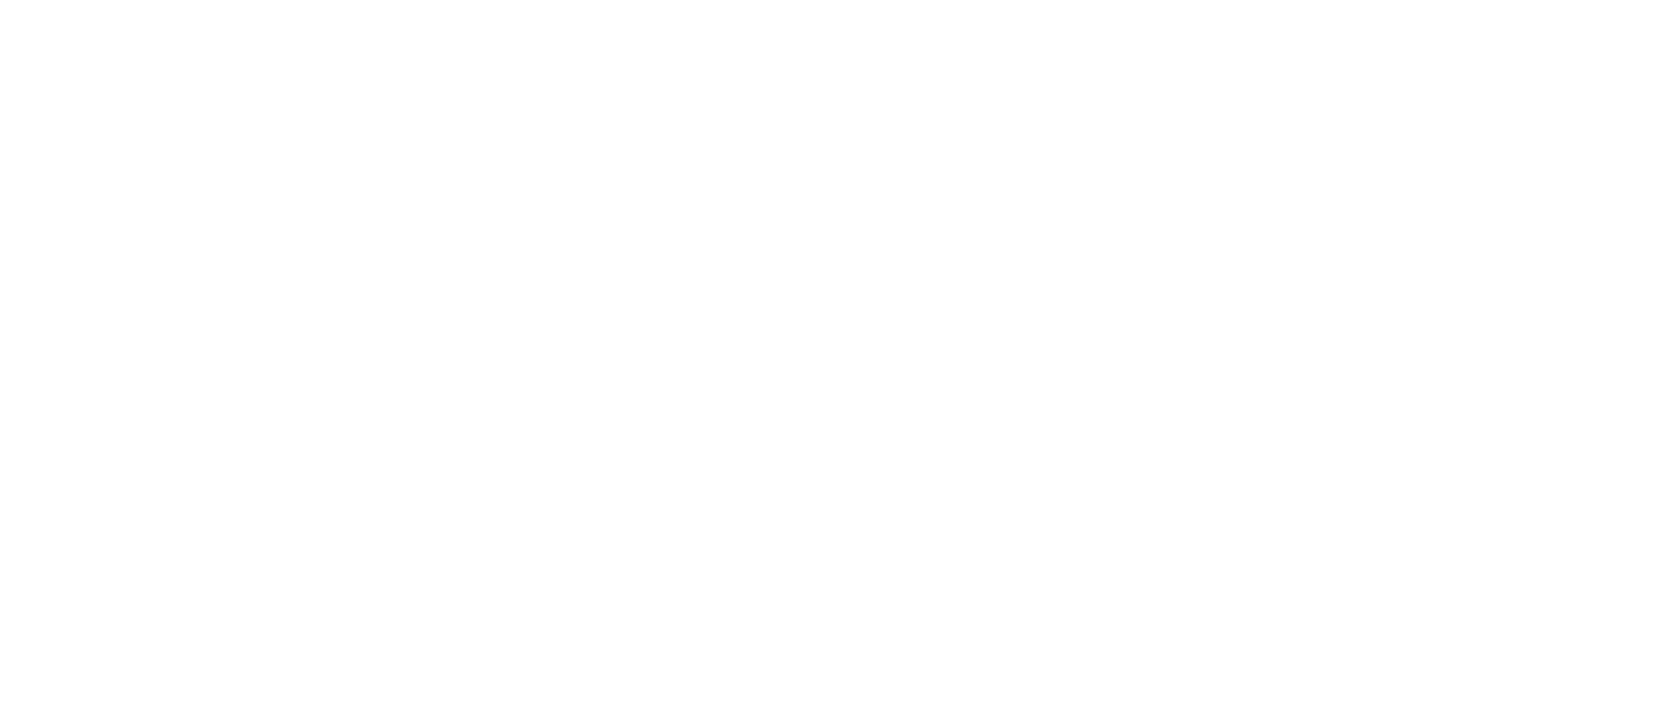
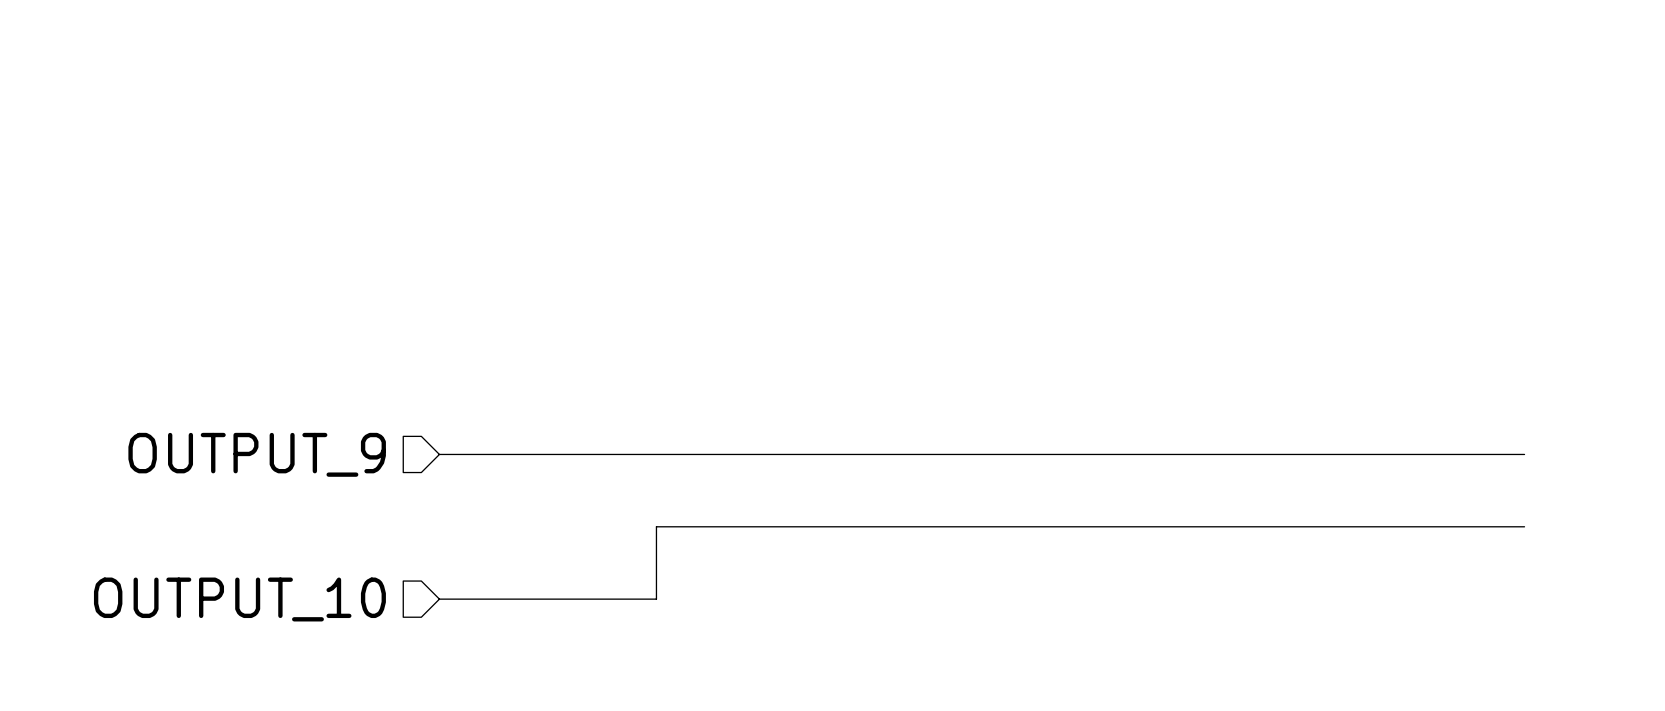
hierarchical label: none -> OUTPUT_9 (257, 454)
wire: none -> (439, 454) (1524, 454)
wire: none -> (1524, 526) (656, 526) (656, 599) (439, 599)
hierarchical label: none -> OUTPUT_10 (239, 599)

